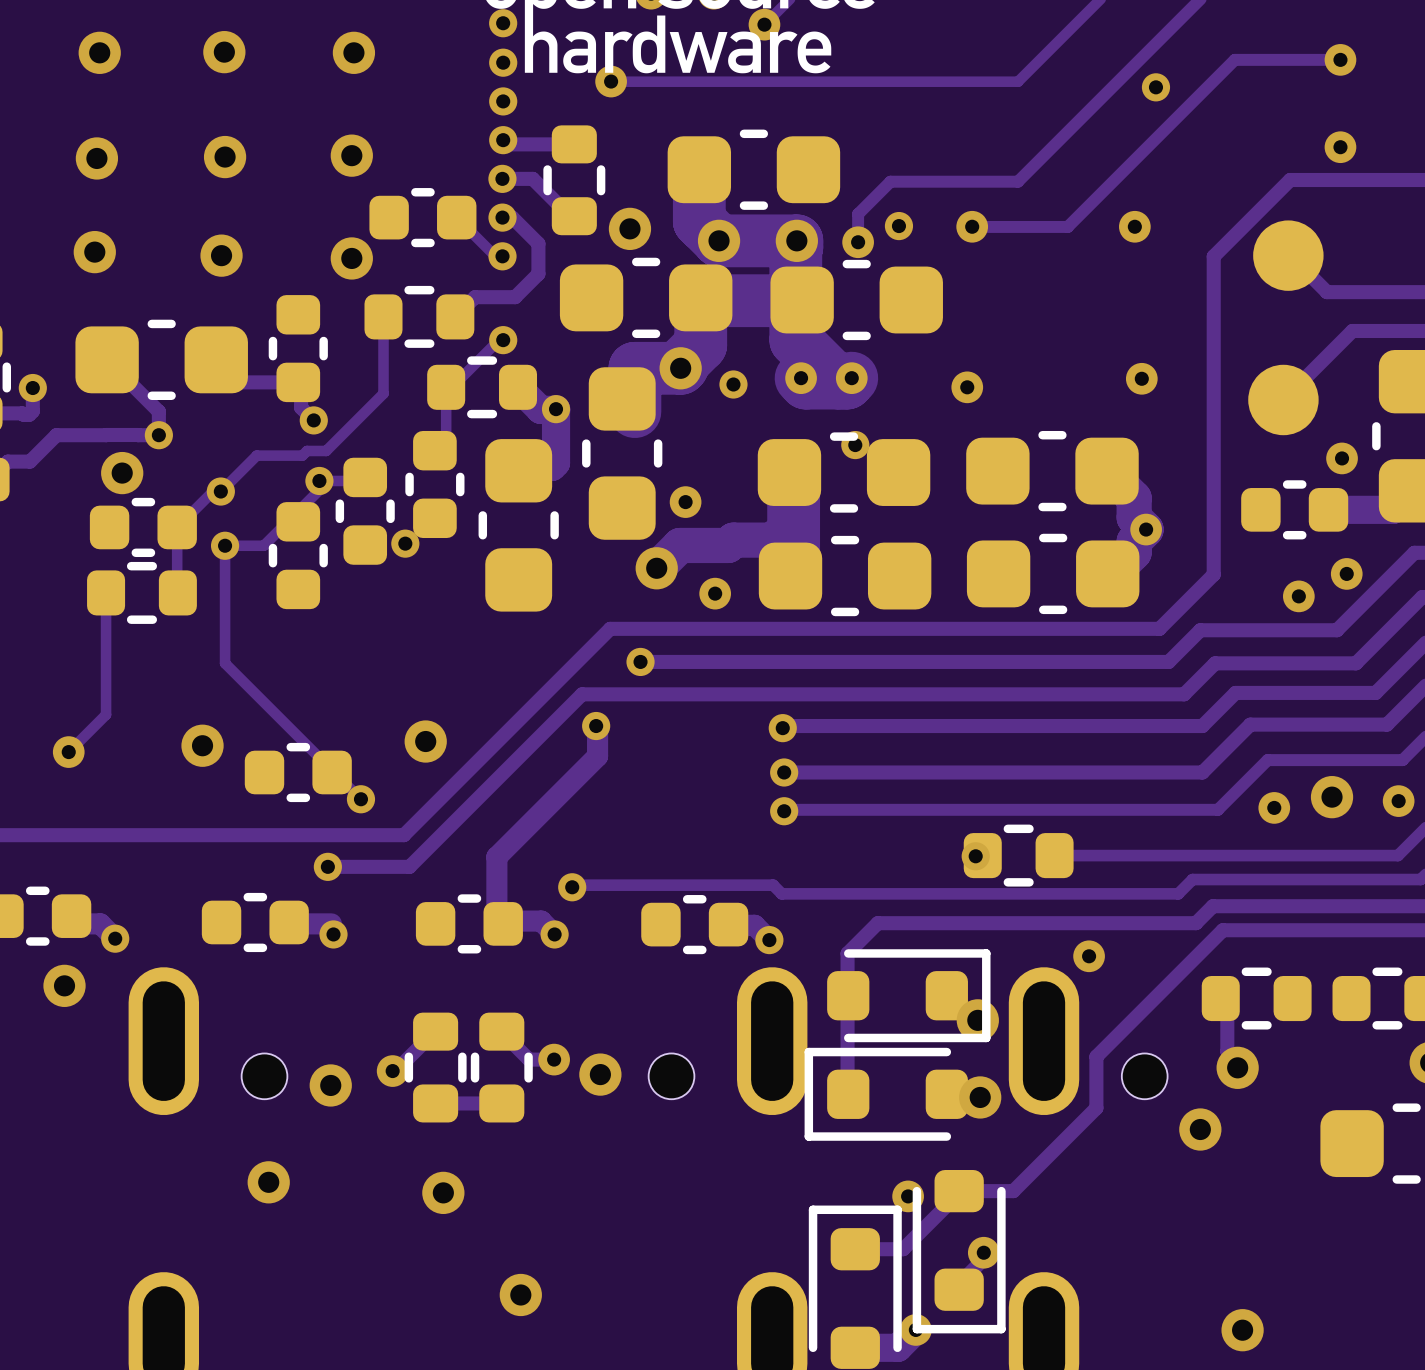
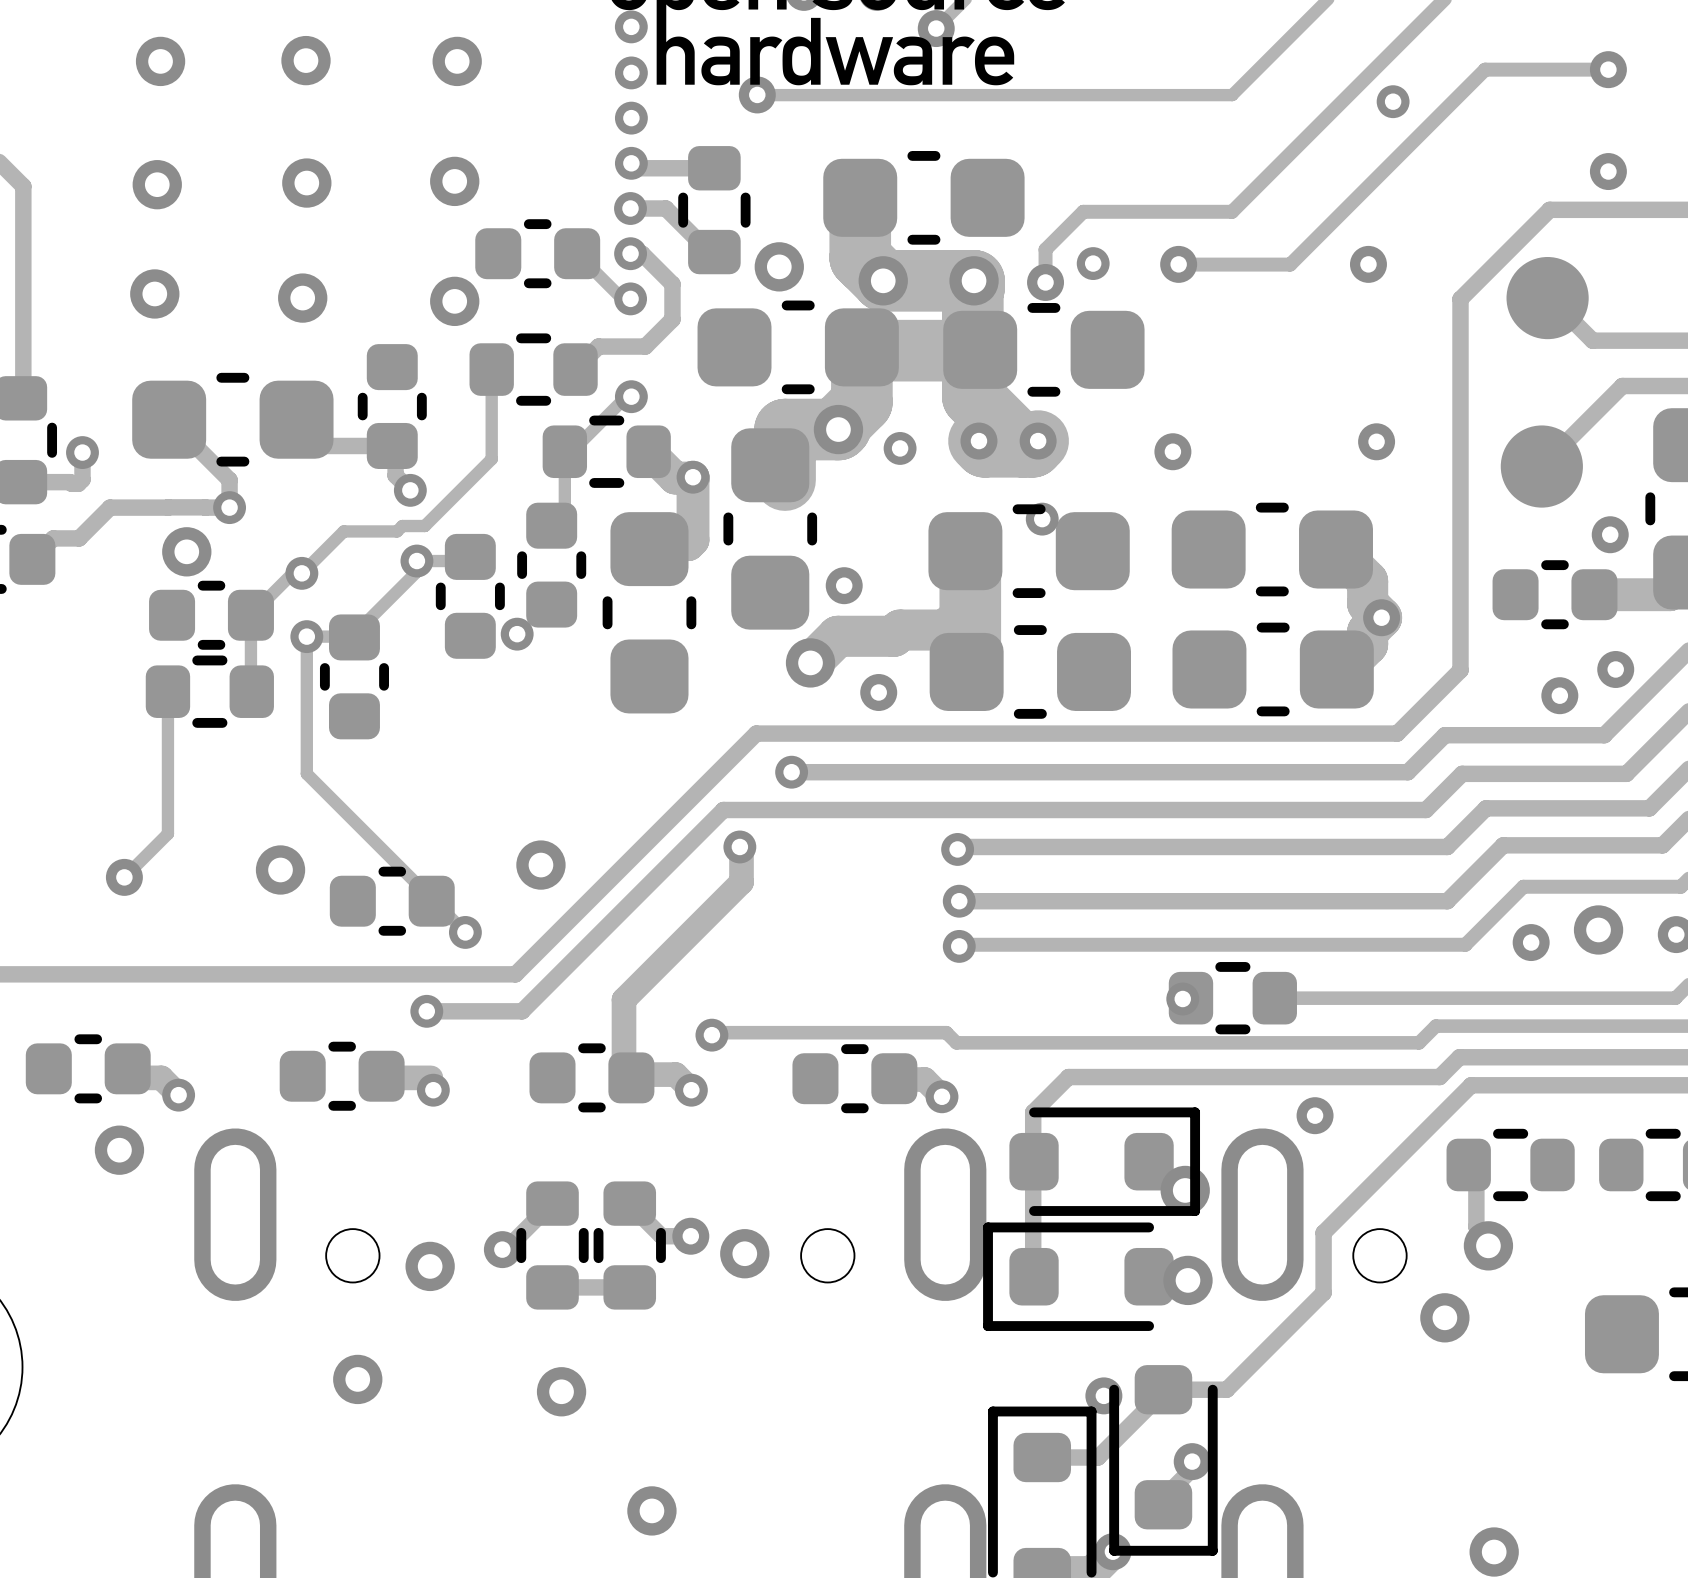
part position: (298, 555) -> (354, 676)

